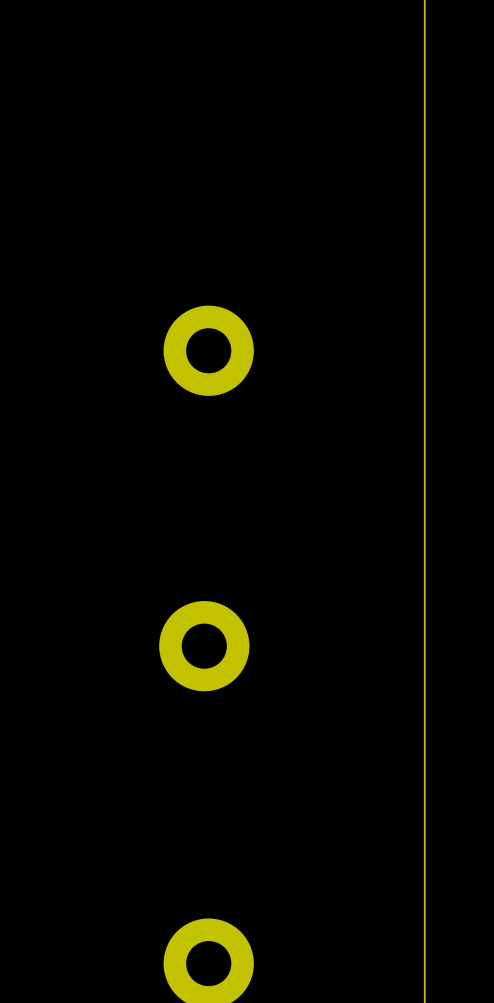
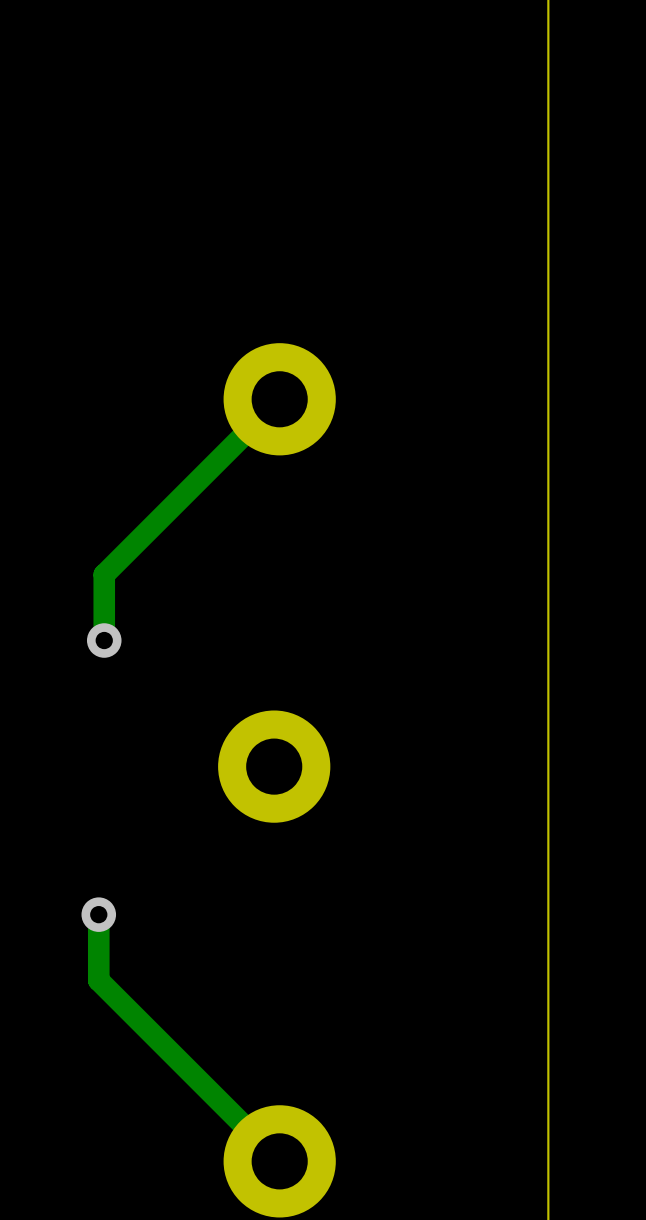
track: none -> (279, 399) (104, 574) (104, 640)
via: none -> (104, 640)
track: none -> (98, 914) (98, 980) (279, 1161)
via: none -> (98, 914)

